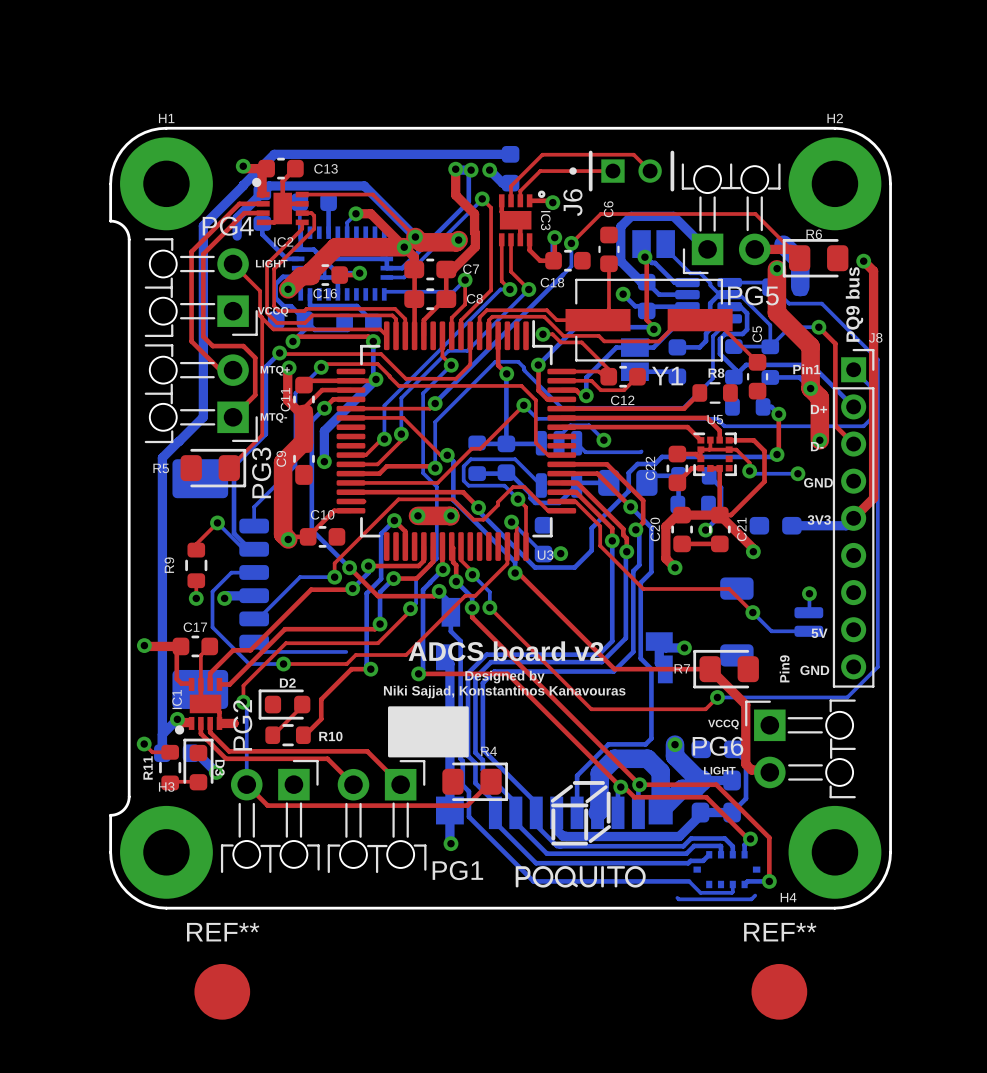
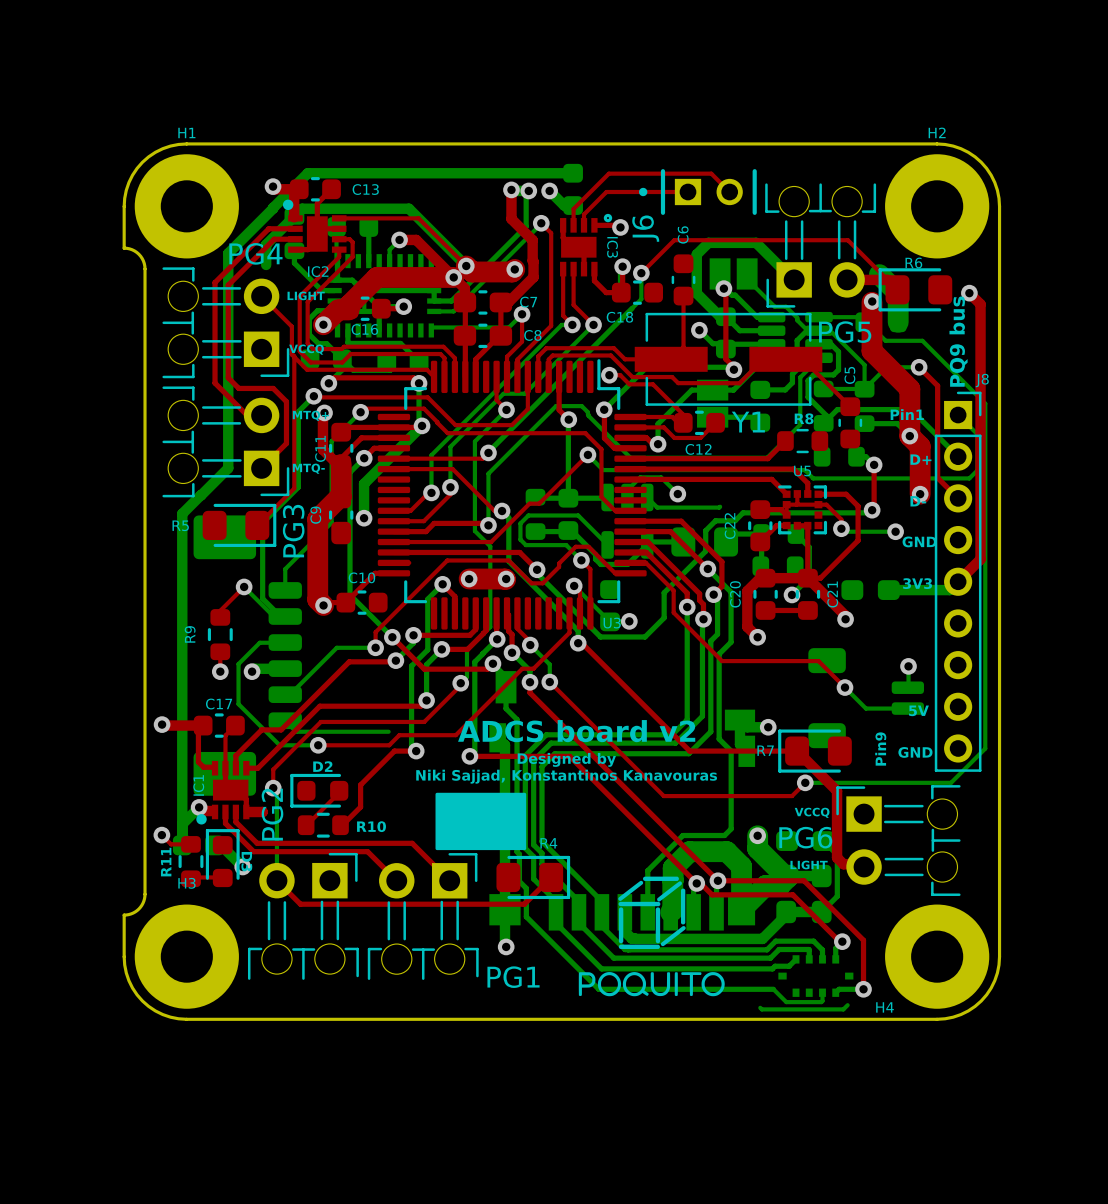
REF**: (222, 991) -> none
REF**: (779, 991) -> none

